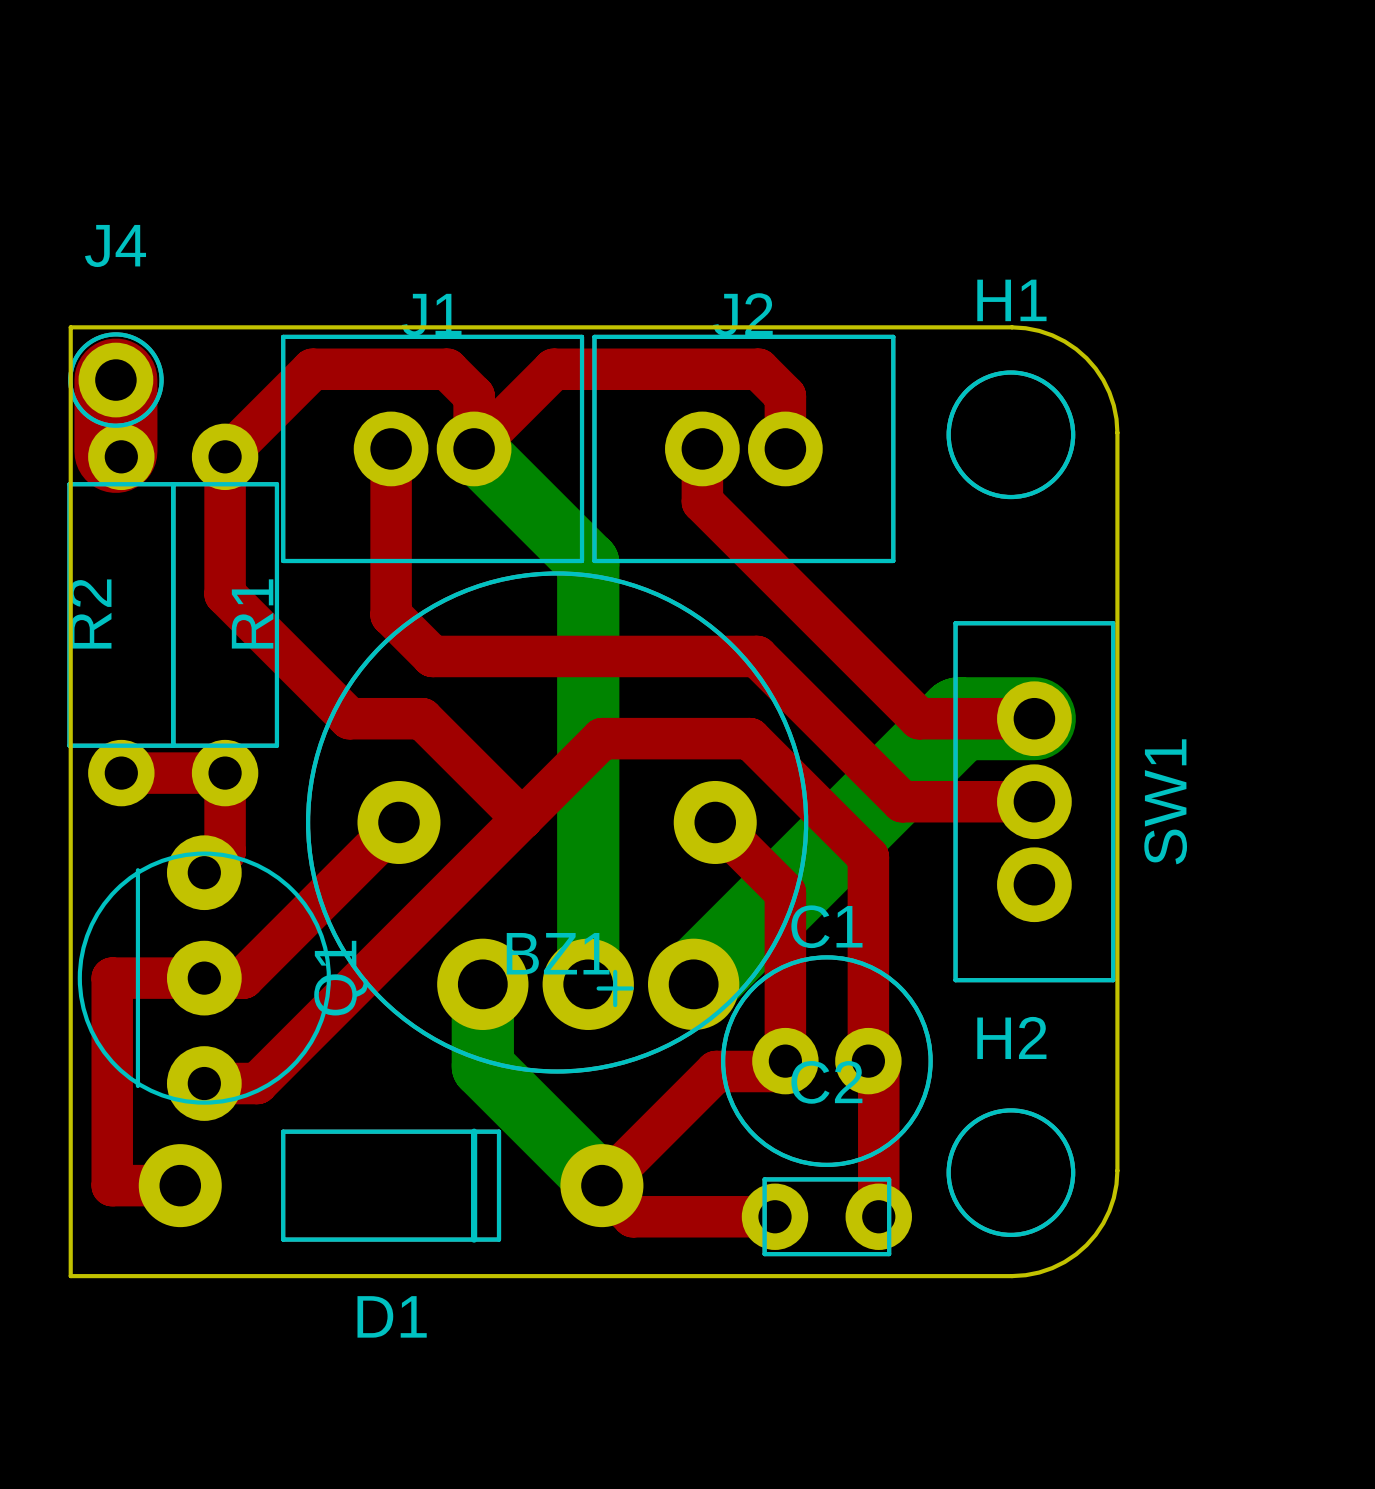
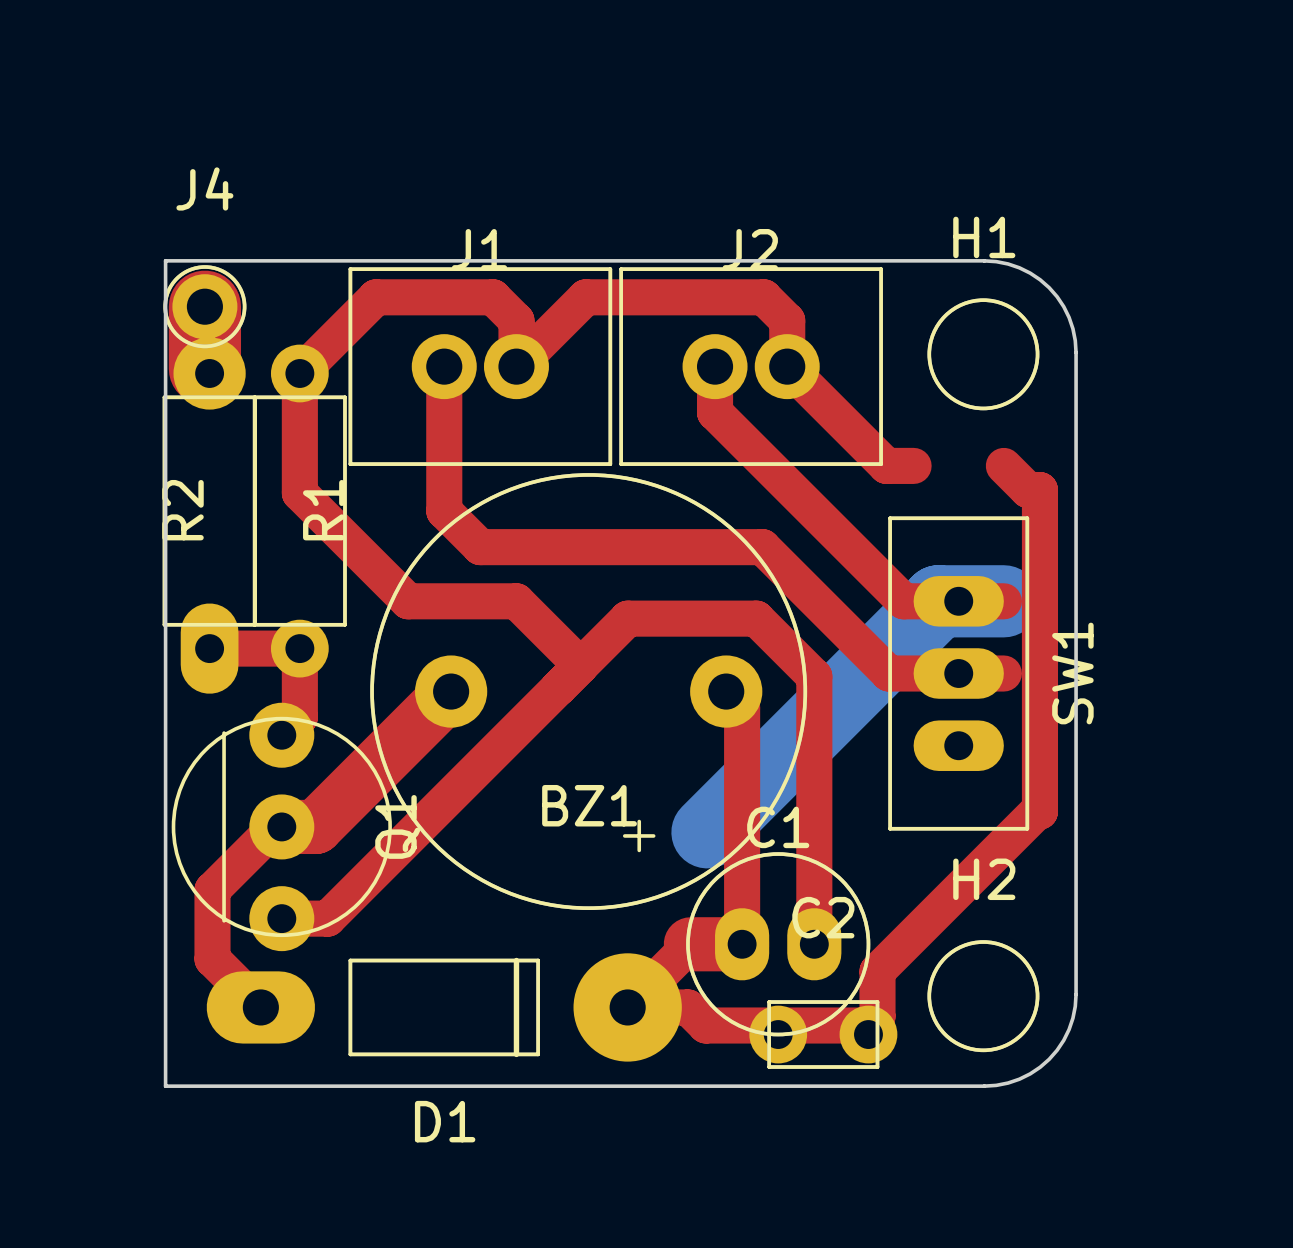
R1 footprint: [67, 423, 176, 807] -> [162, 337, 257, 694]
bottom track: (474, 448) (588, 563) (588, 984) -> none
top track: none -> (787, 366) (886, 465) (913, 465)
SW1 footprint: [953, 621, 1116, 983] -> [888, 516, 1030, 831]
top track: (422, 718) (522, 818) -> (471, 601) (516, 601) (580, 665)
top track: (816, 805) (868, 857) (868, 1061) (878, 1071) (878, 1216) -> (814, 676) (814, 944)
top track width: thin (398, 822) (243, 978) (204, 978) -> thick (451, 691) (315, 826) (281, 826)
top track: (733, 840) (785, 892) (785, 1061) -> (742, 707) (742, 944) (690, 944)
C1 footprint: [721, 955, 933, 1167] -> [686, 852, 871, 1037]
top track: (197, 978) (112, 978) (112, 1185) (180, 1185) -> (275, 826) (212, 889) (212, 959) (260, 1007)
bottom track: (482, 984) (482, 1066) (601, 1185) -> none
part: (588, 984) -> none
top track: (785, 1071) (716, 1071) (674, 1113) -> none
D1 footprint: [138, 1128, 644, 1243] -> [206, 953, 682, 1062]
top track: (601, 1185) (633, 1216) (775, 1216) -> (627, 1007) (687, 1007) (706, 1025) (868, 1025) (877, 1016) (877, 971) (1037, 811) (1039, 811) (1039, 490) (1028, 490) (1003, 465)

